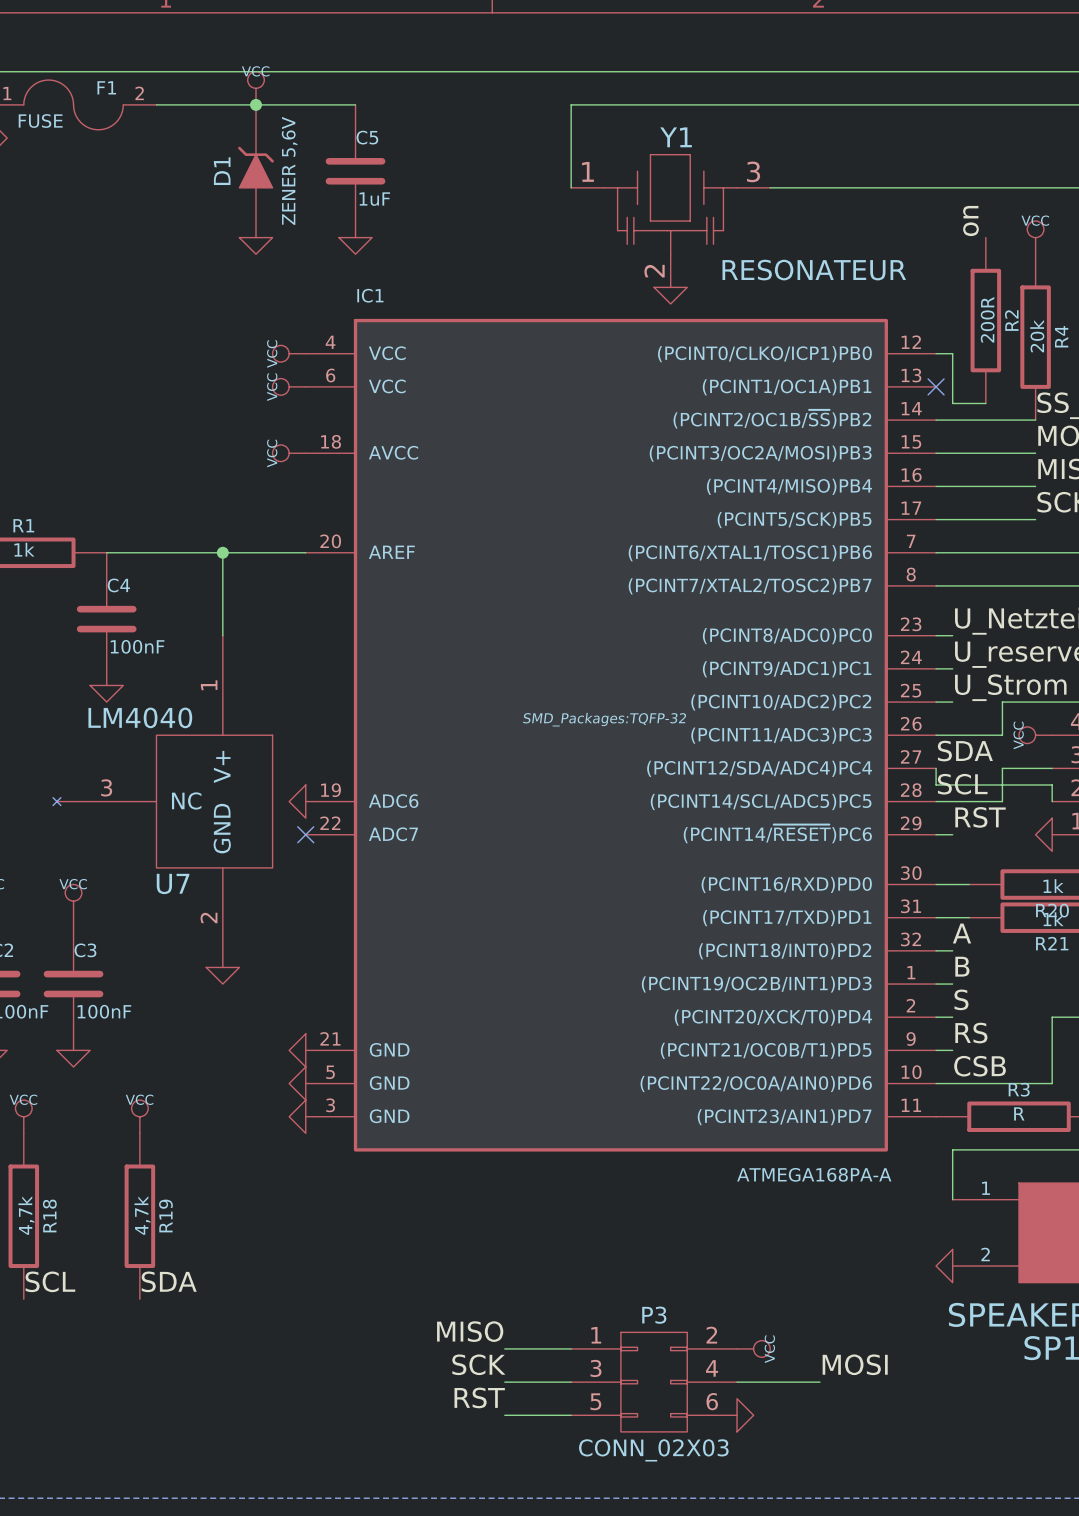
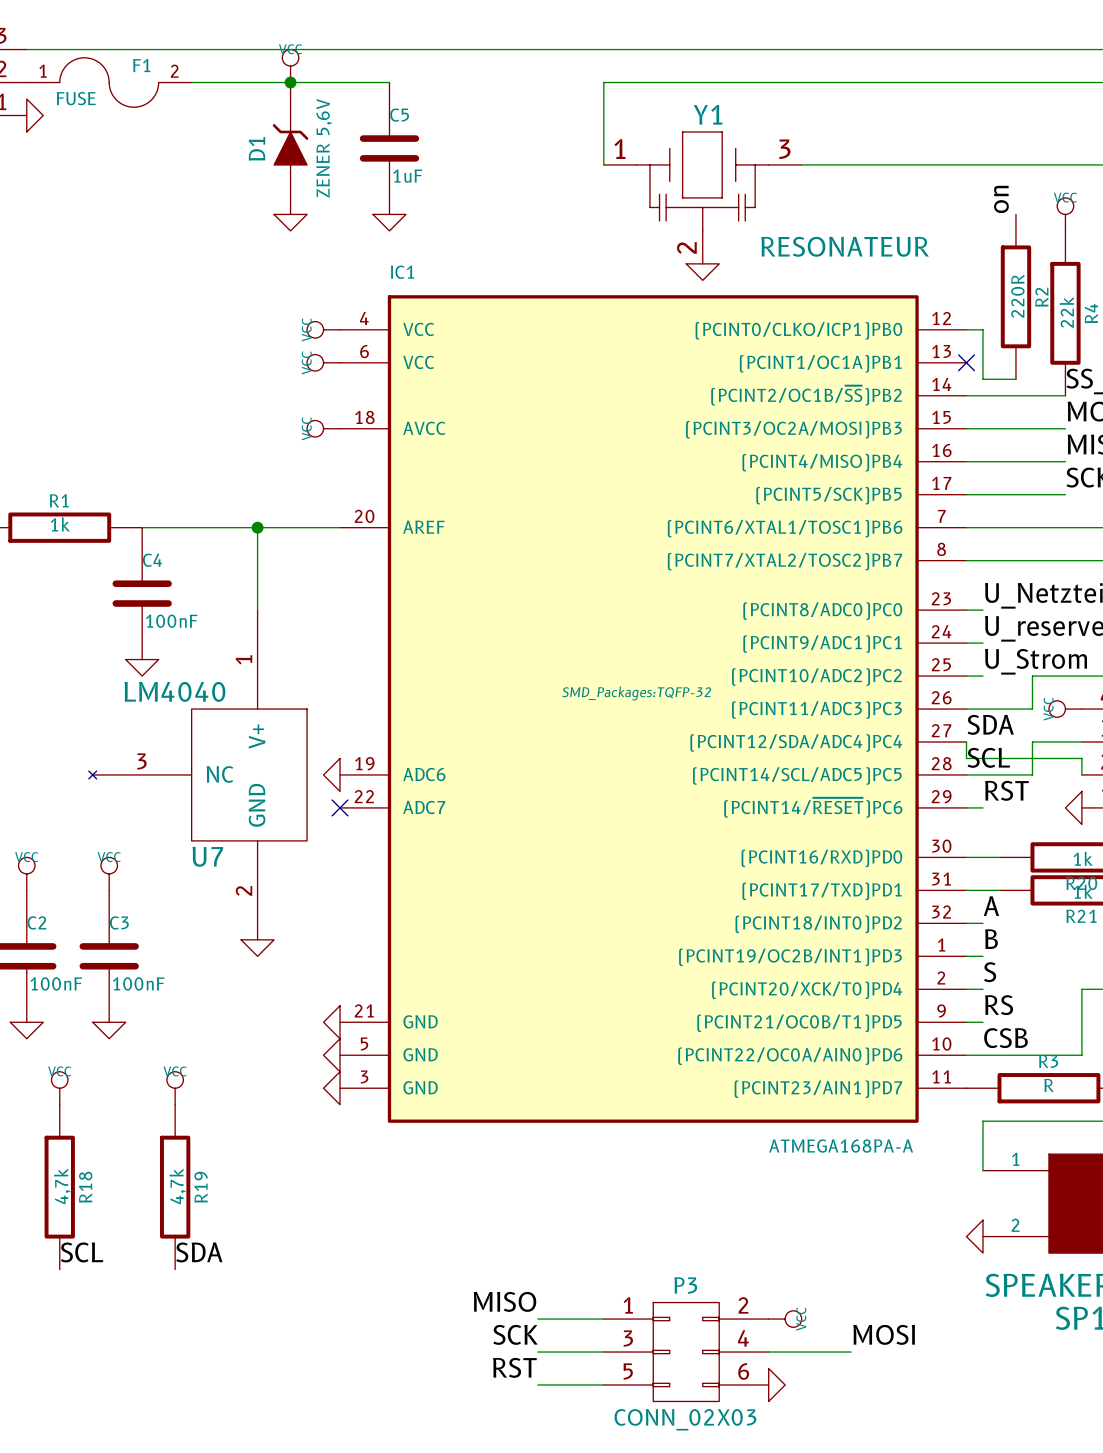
R2 value: 200R (987, 319) -> 220R (1017, 296)
R4 value: 20k (1037, 336) -> 22k (1066, 312)

